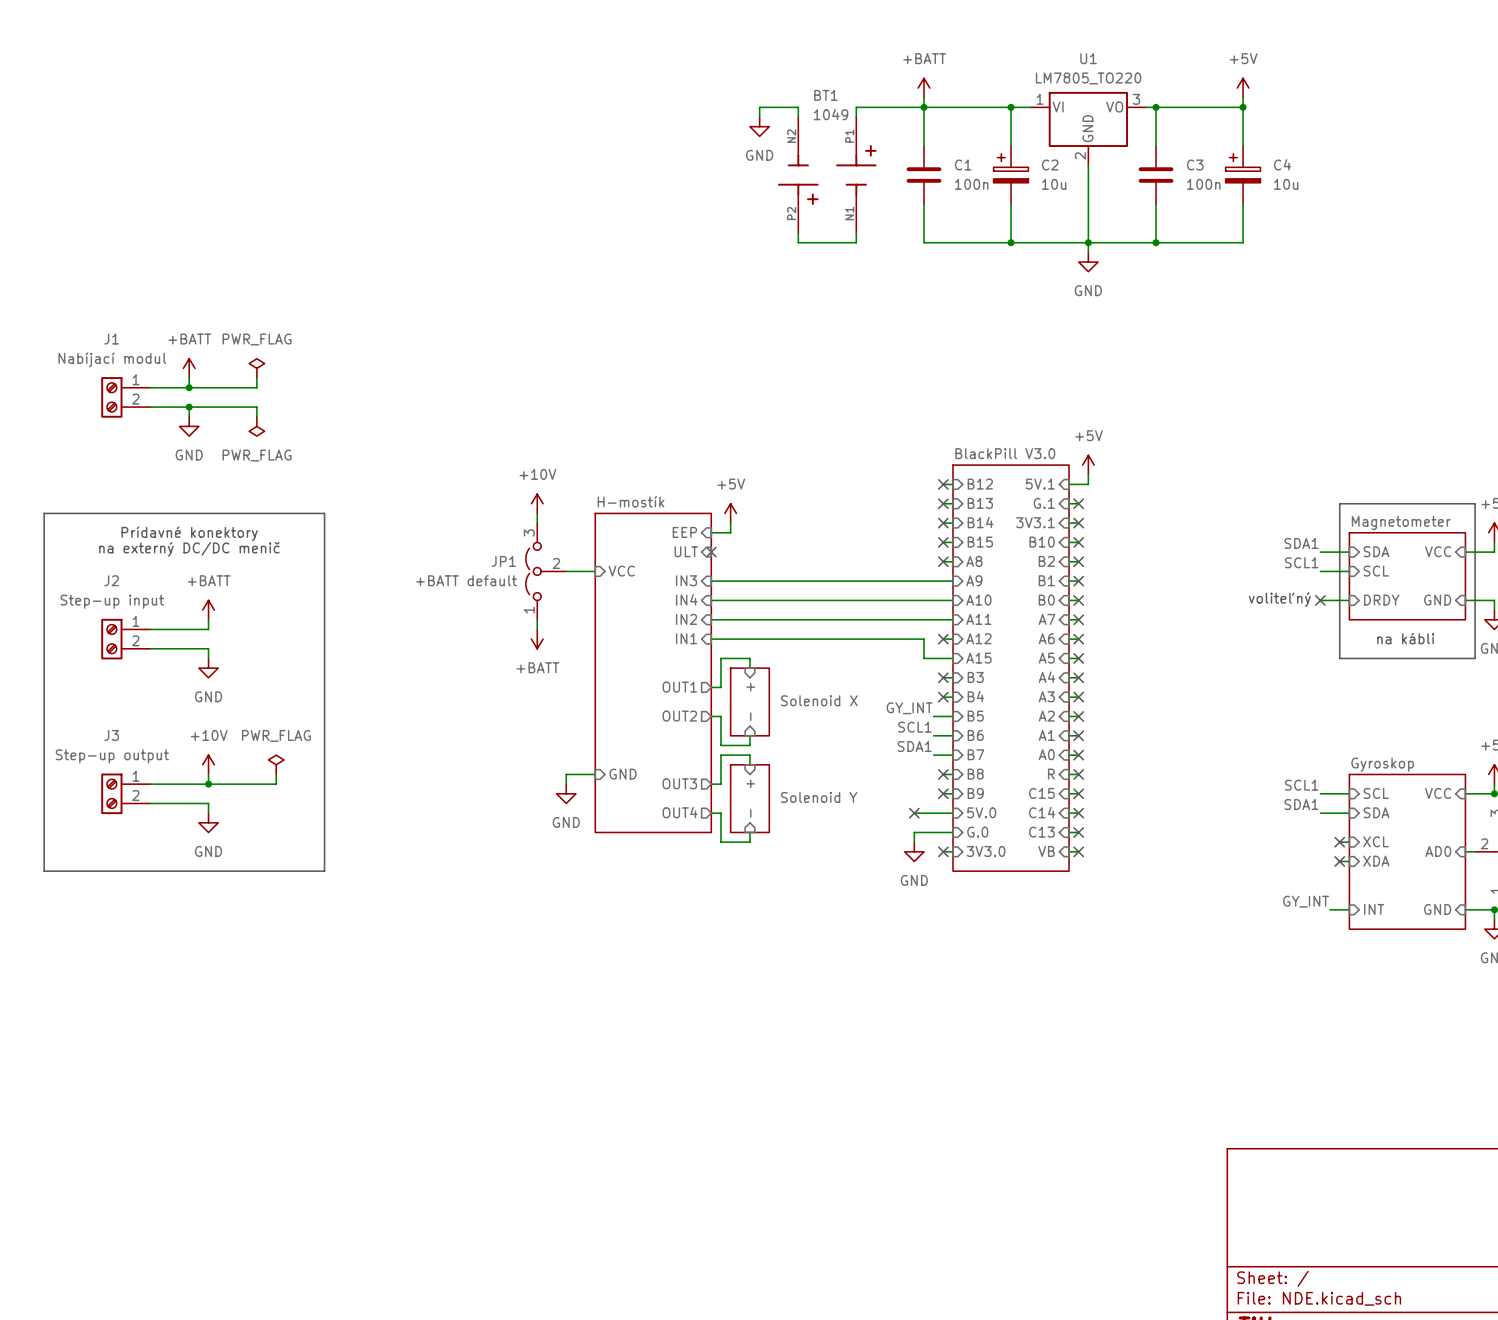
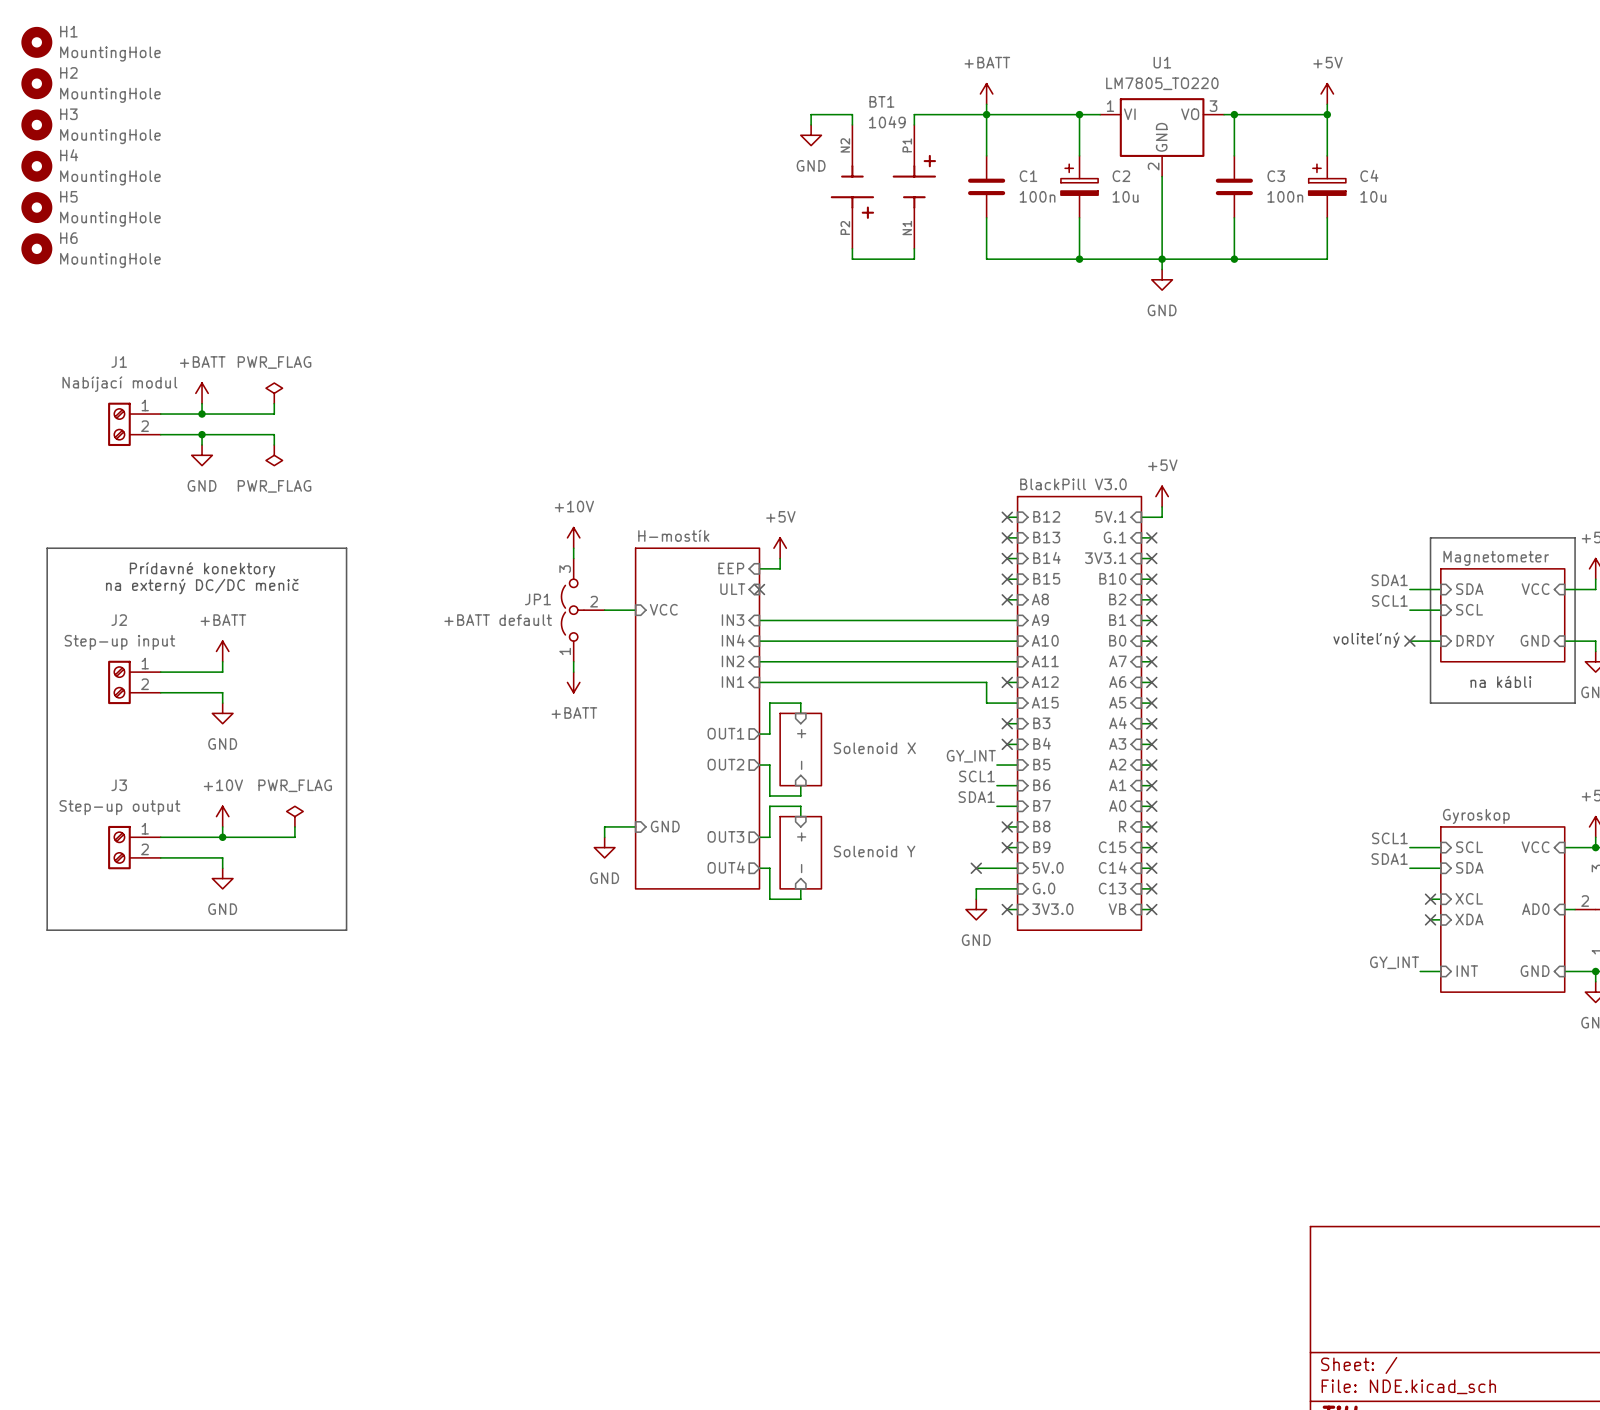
H1: none -> MountingHole (36, 42)
H2: none -> MountingHole (36, 83)
H3: none -> MountingHole (36, 124)
H4: none -> MountingHole (36, 166)
H5: none -> MountingHole (36, 207)
H6: none -> MountingHole (36, 248)

